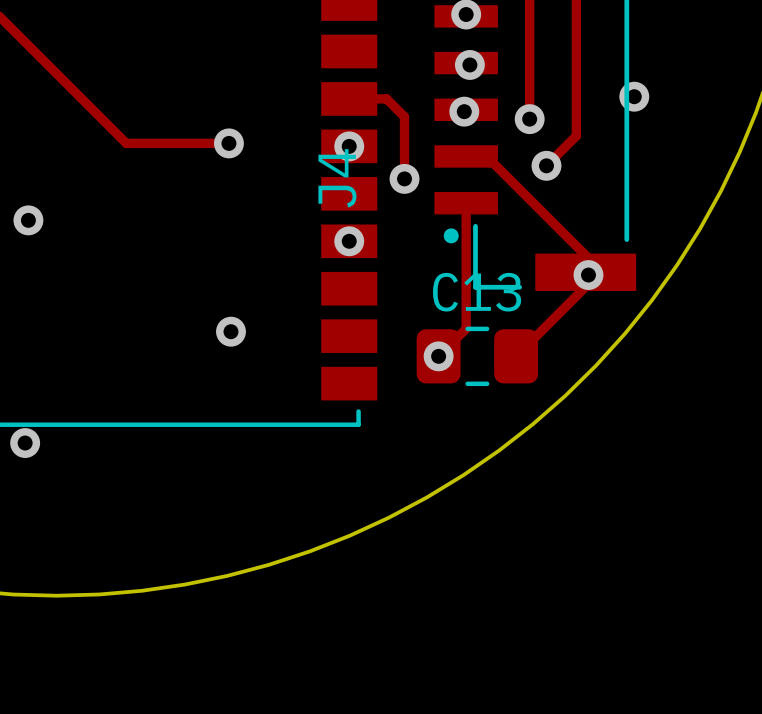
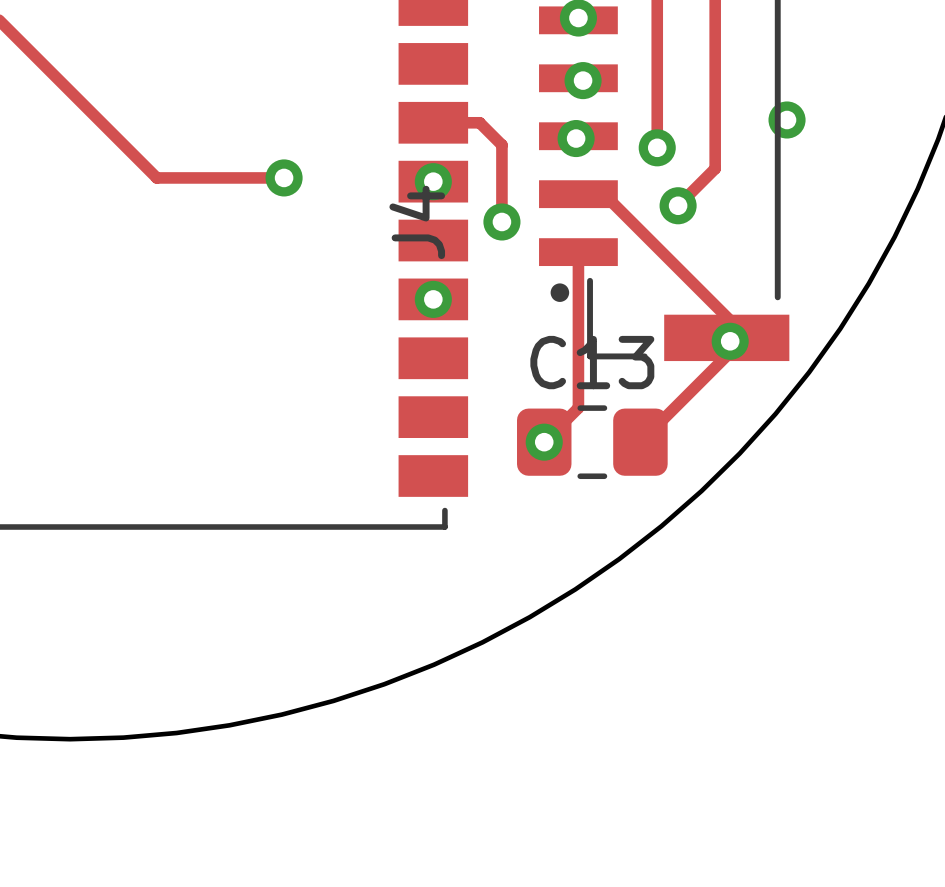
via: (28, 220) -> none
via: (230, 331) -> none
via: (25, 443) -> none

